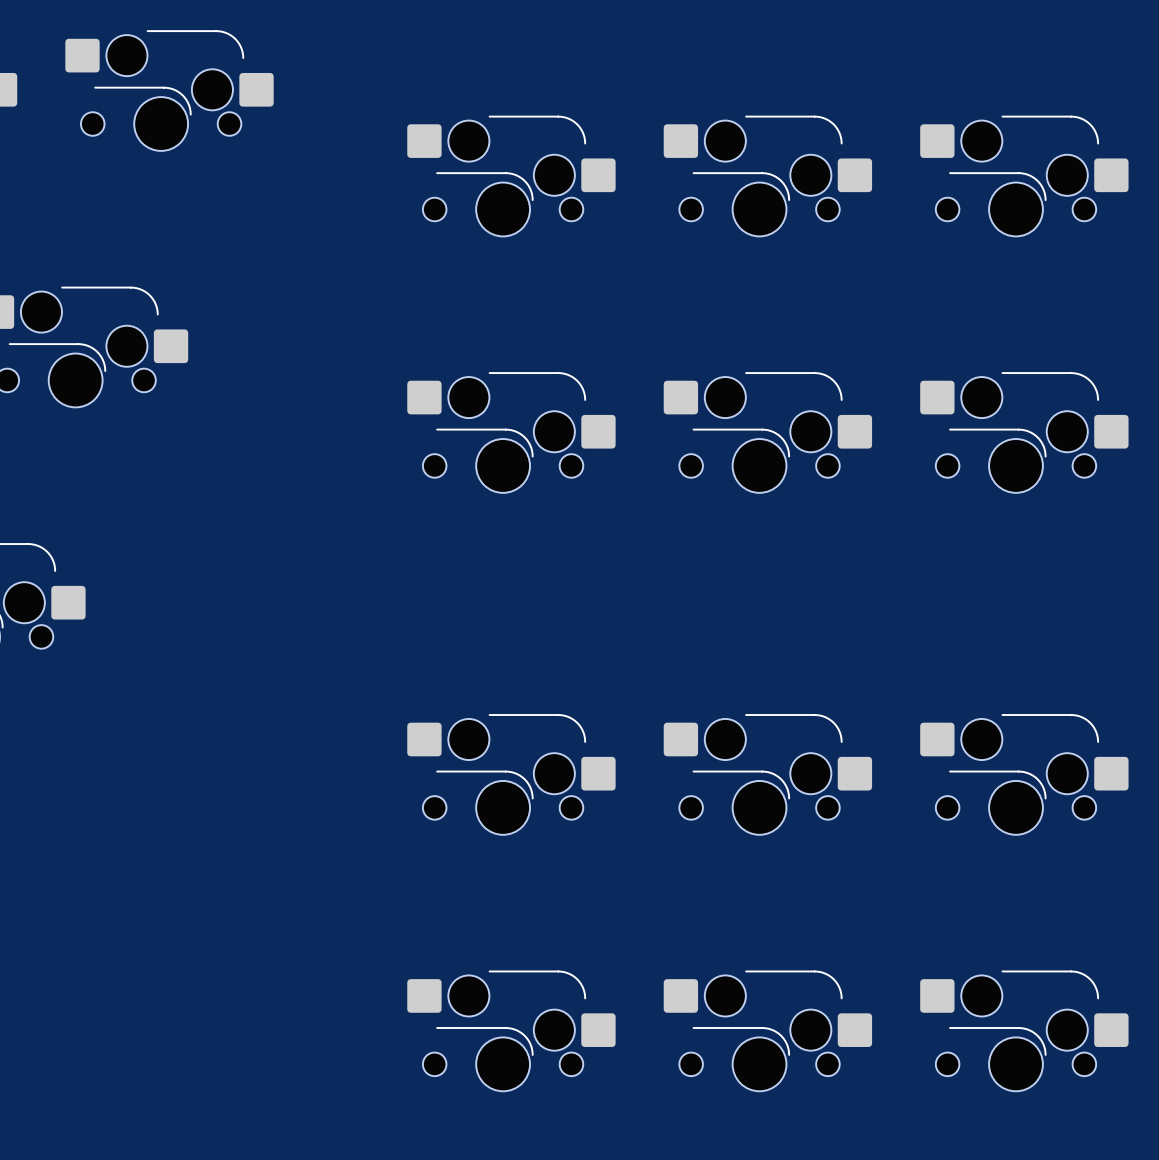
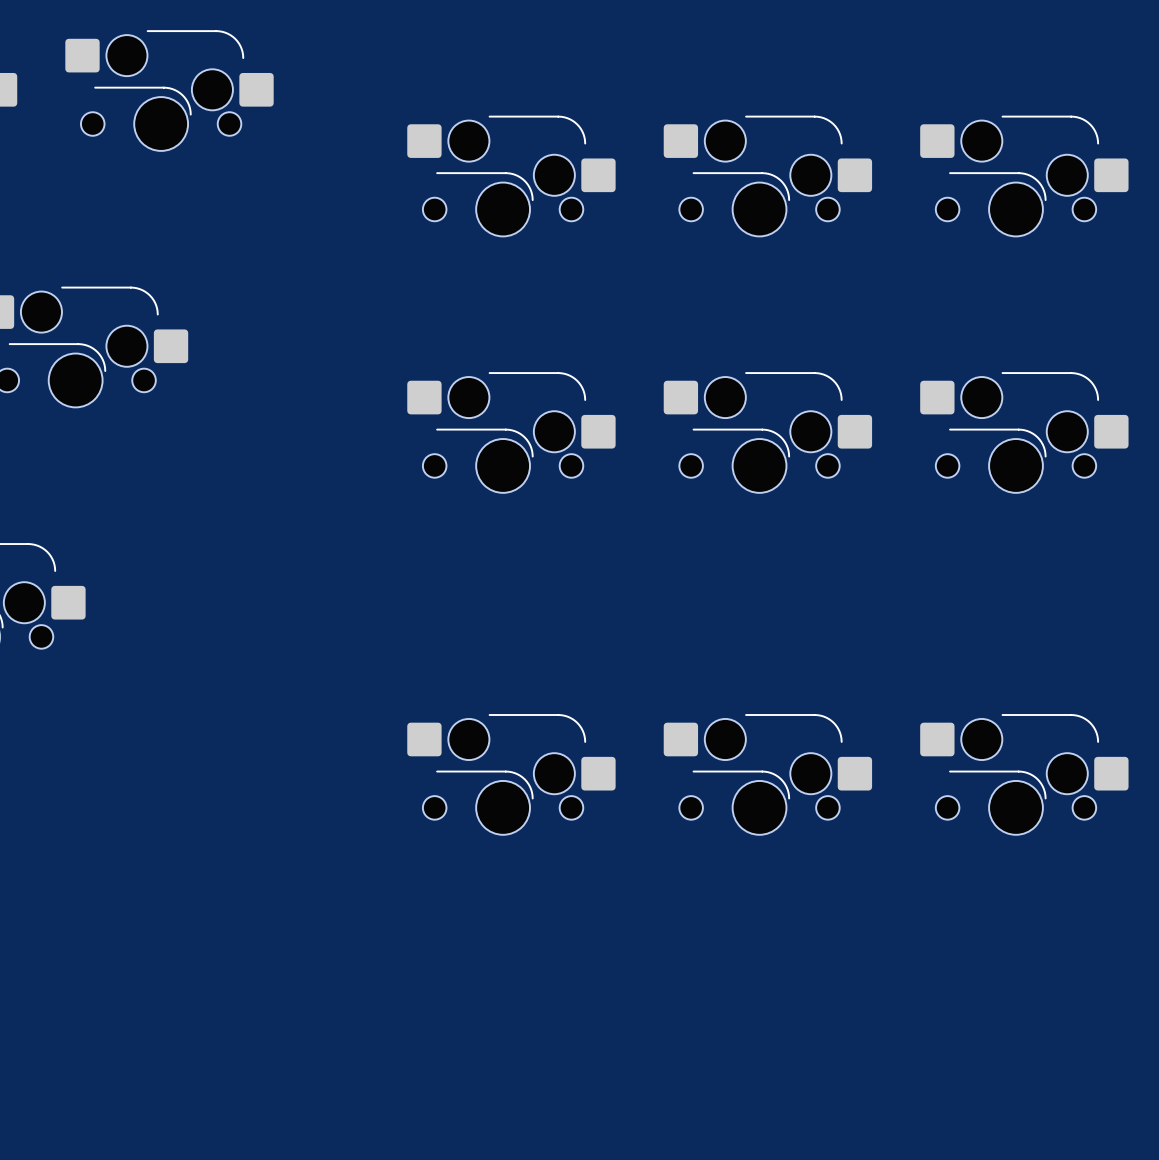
part: (511, 1030) -> none
part: (767, 1030) -> none
part: (1024, 1030) -> none

